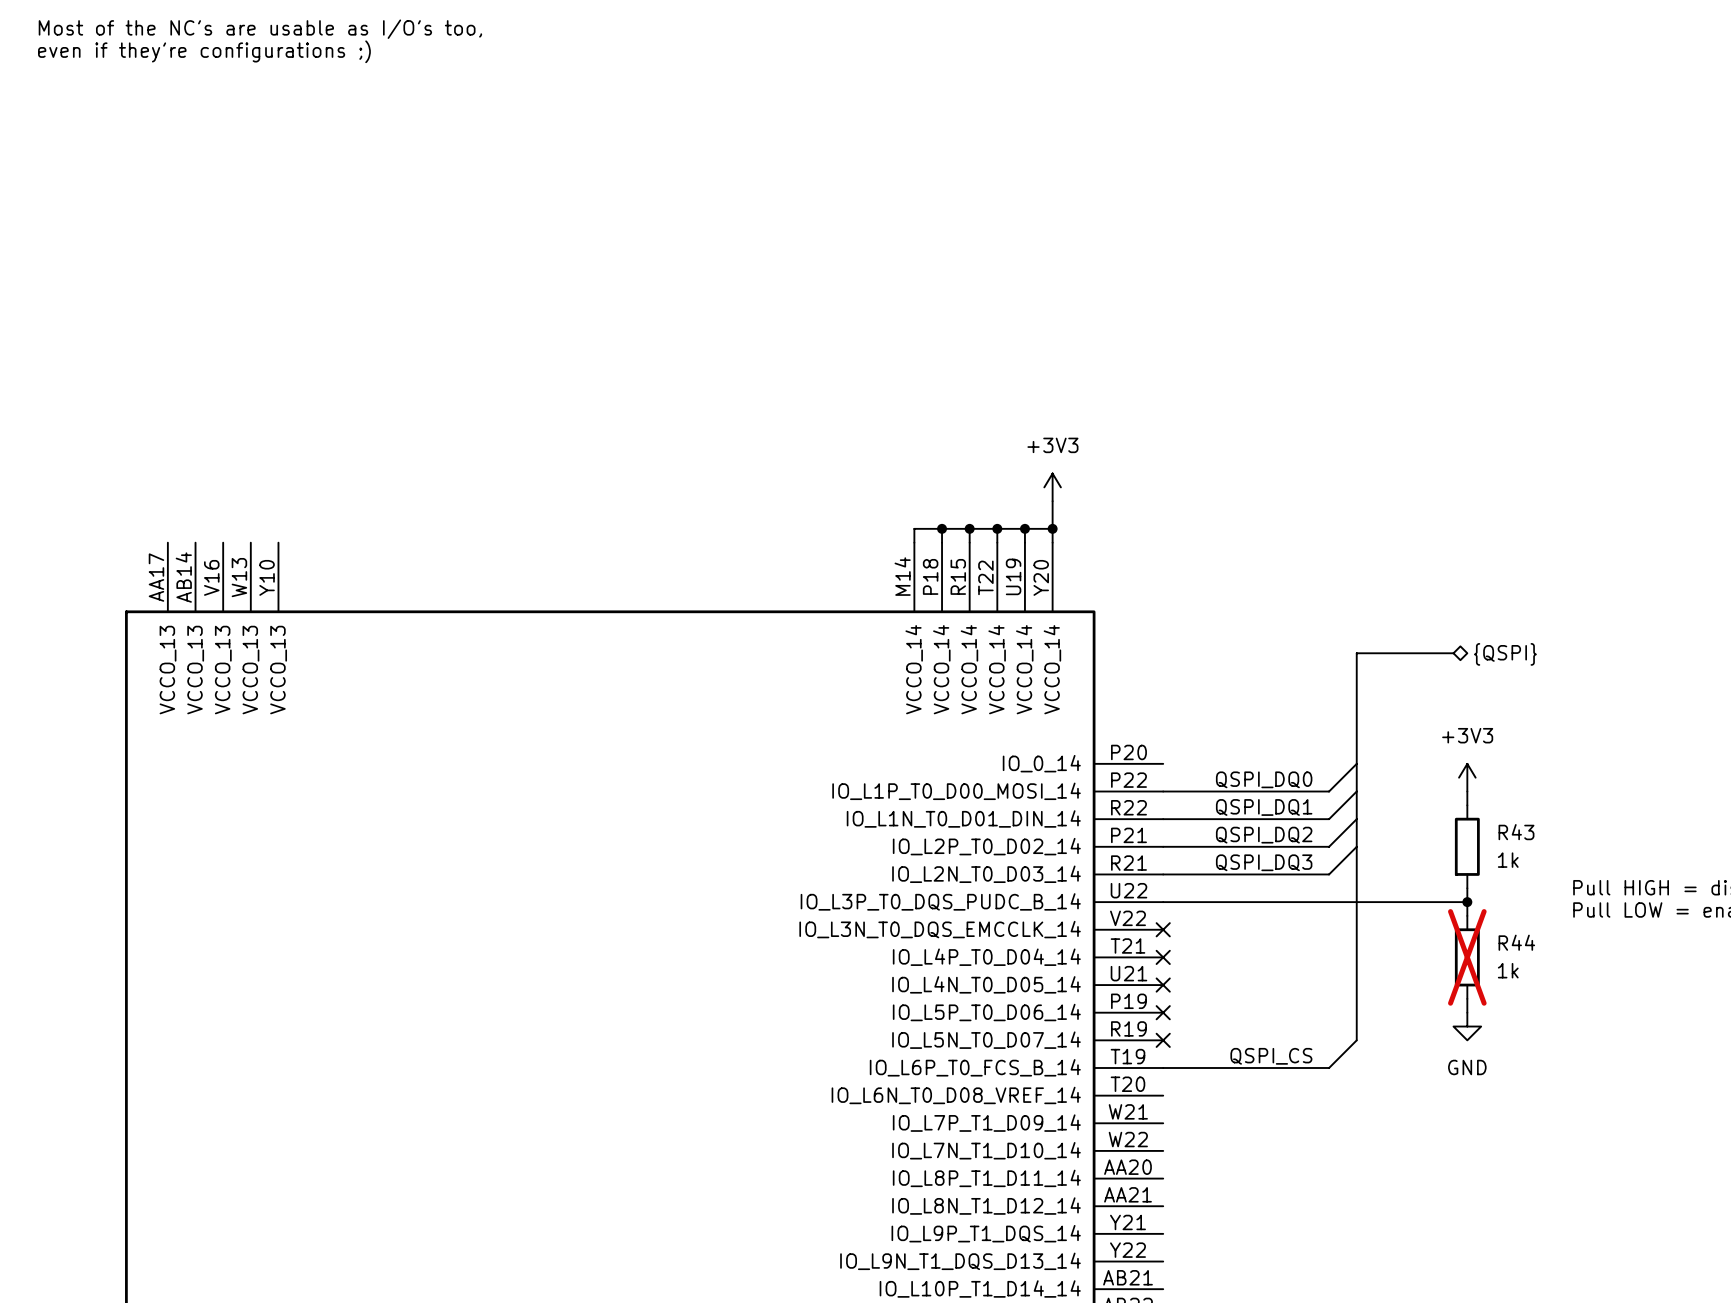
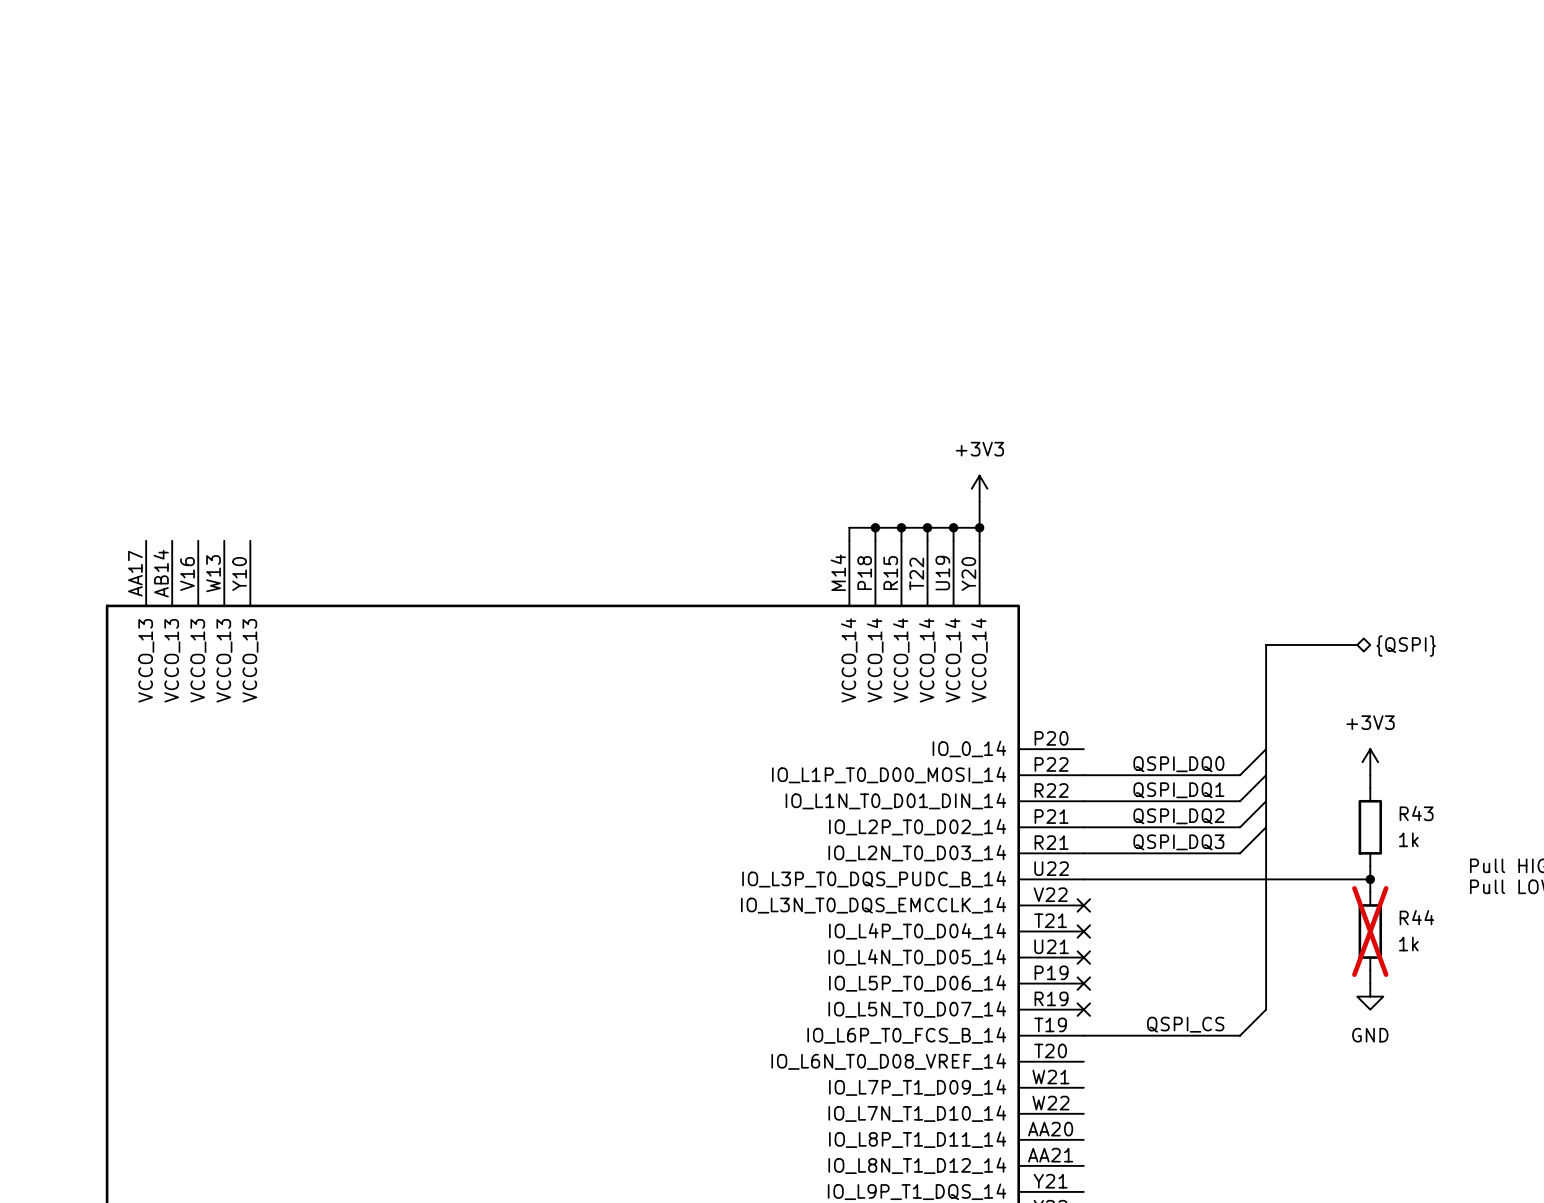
text: Most of the NC's are usable as I/O's too, (260, 29) -> none
text: even if they're configurations ;) (204, 51) -> none

